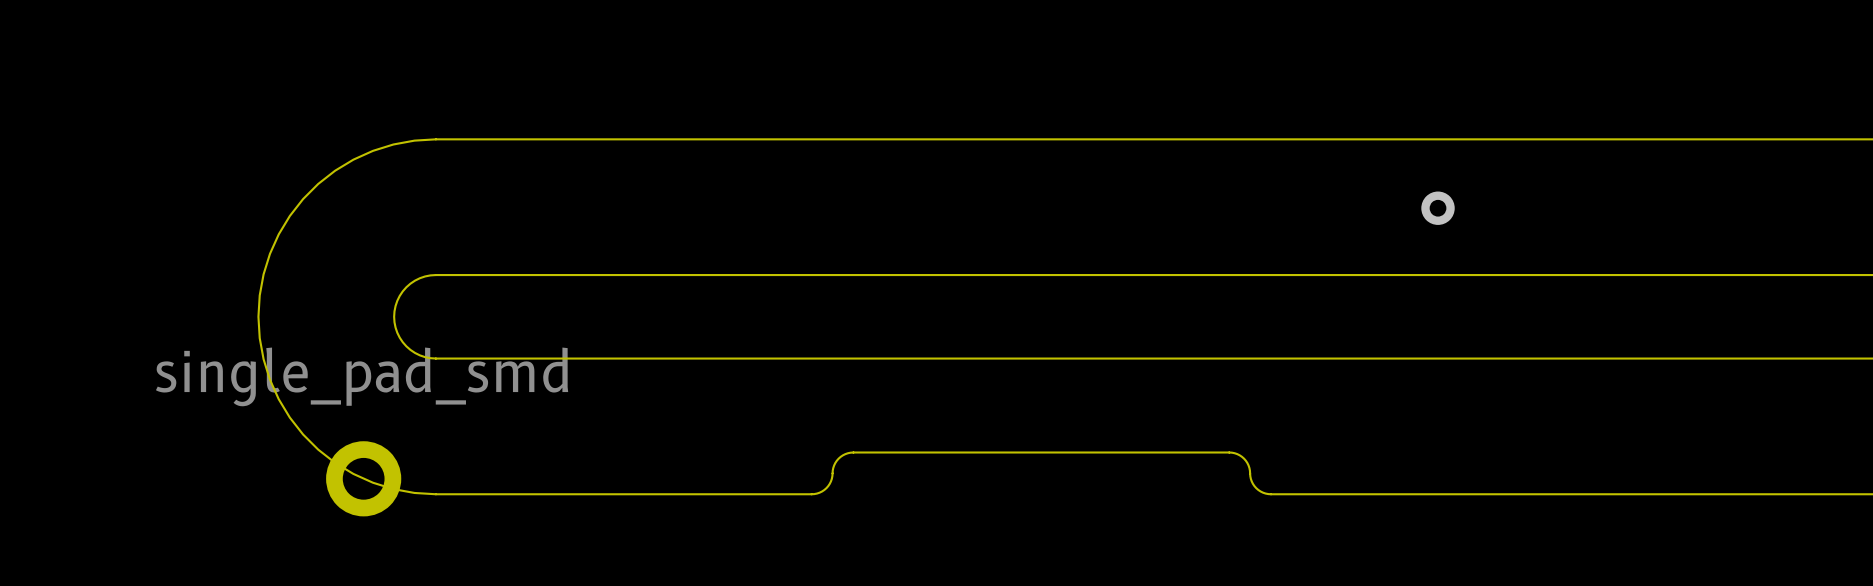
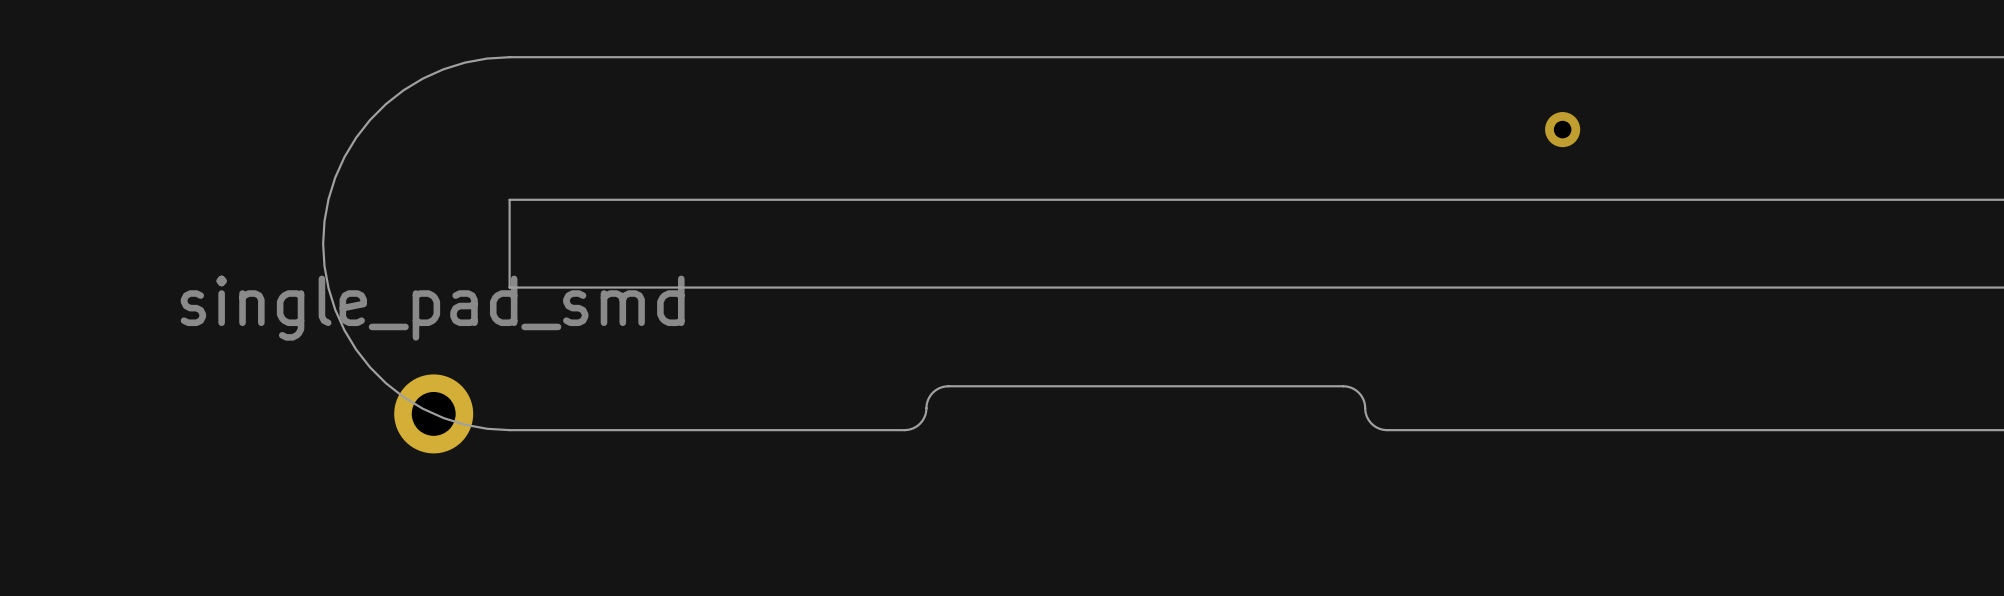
board edge: (435, 275) (419, 278) (406, 287) (397, 300) (394, 316) (397, 332) (406, 346) (419, 355) (435, 358) -> (509, 199) (509, 287)

